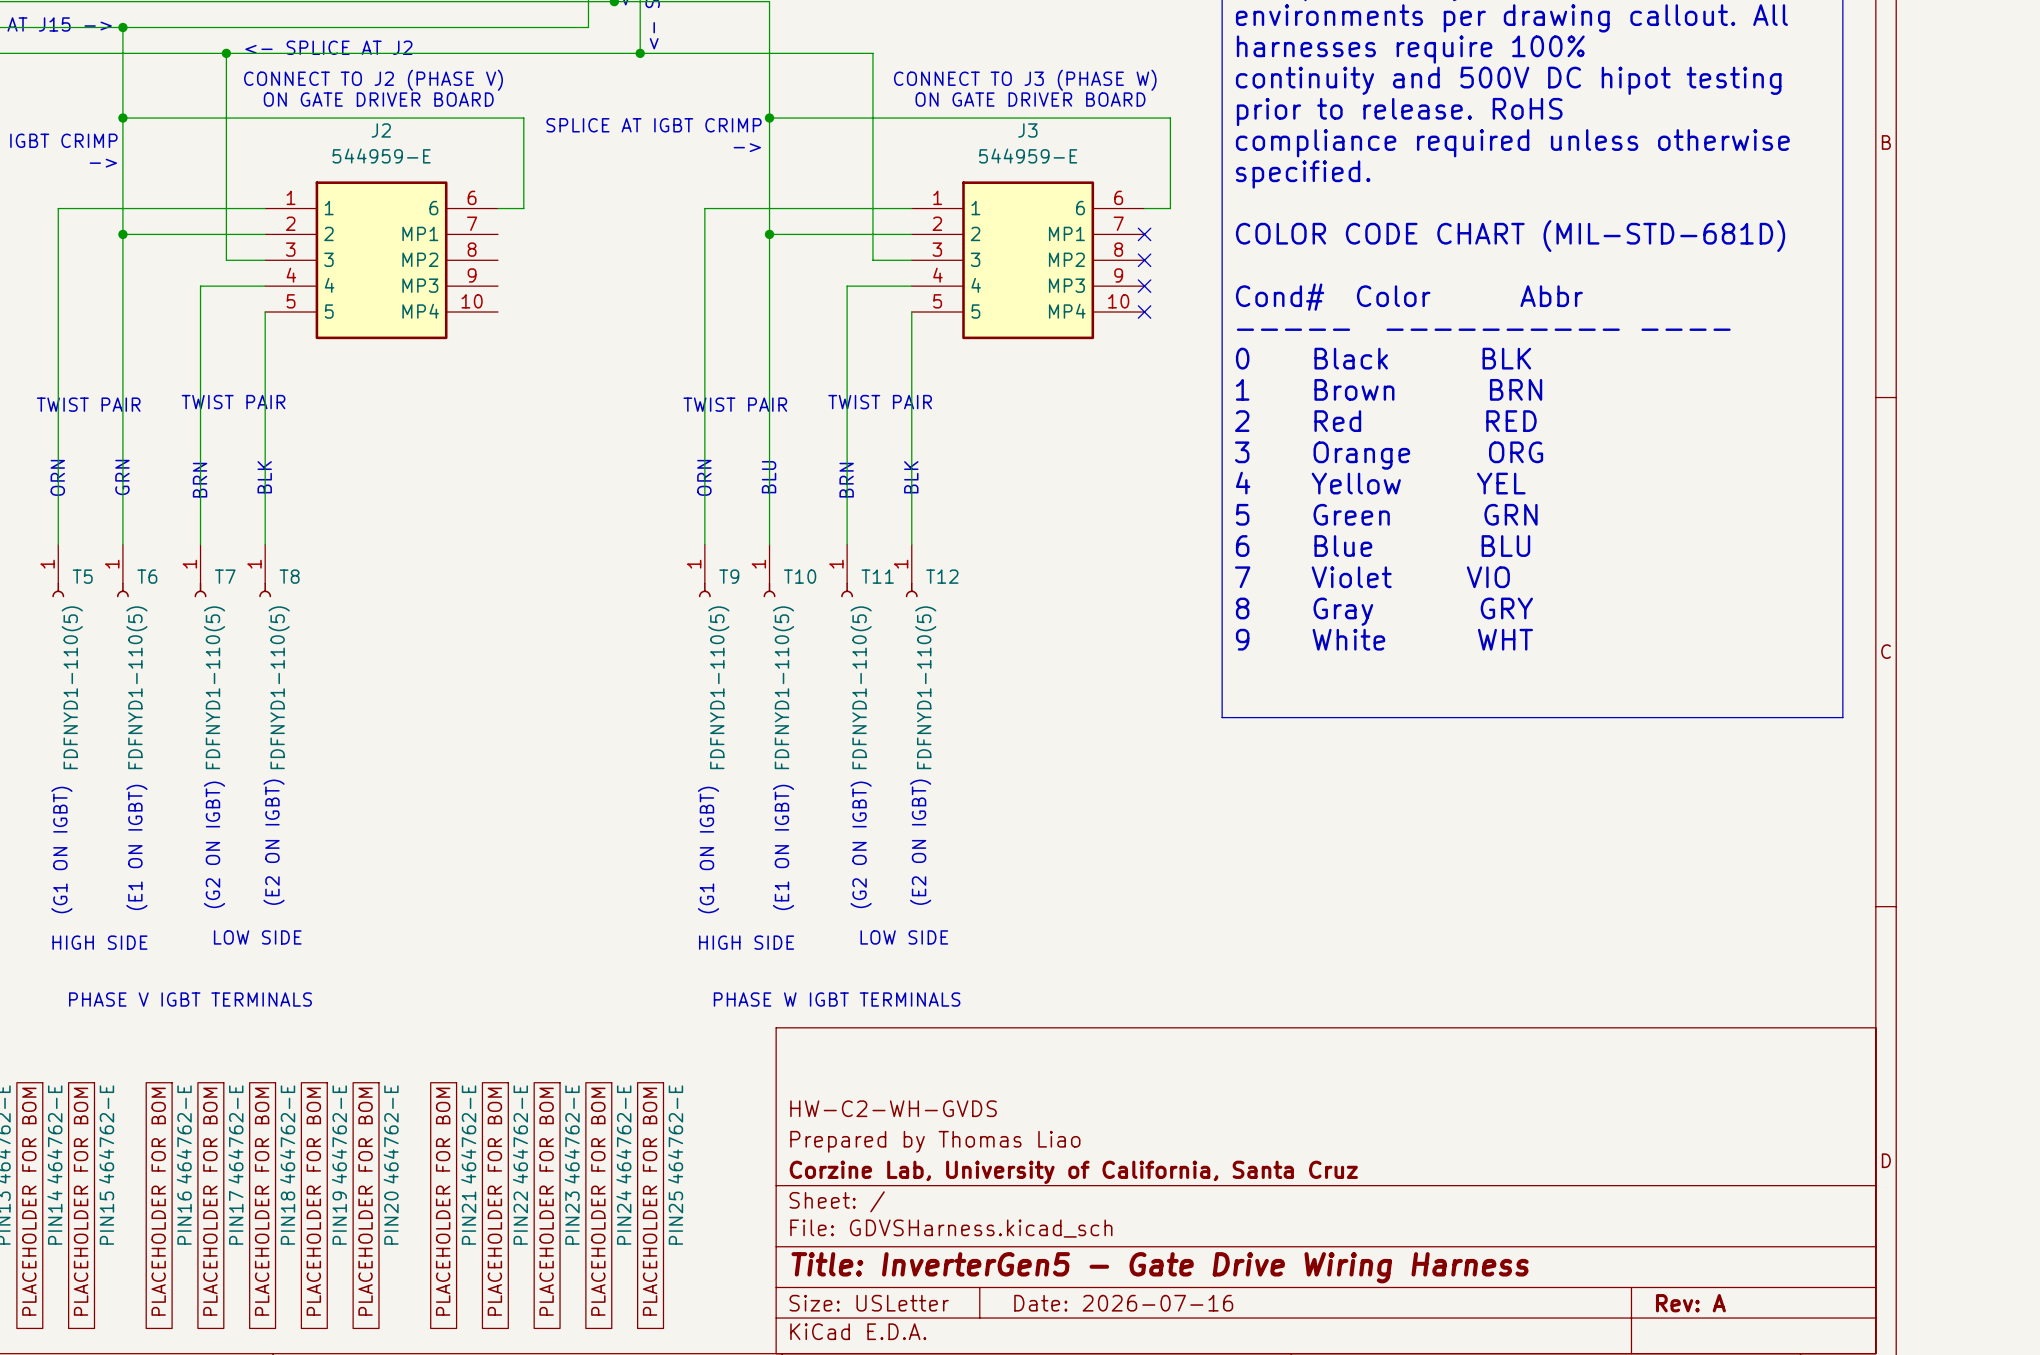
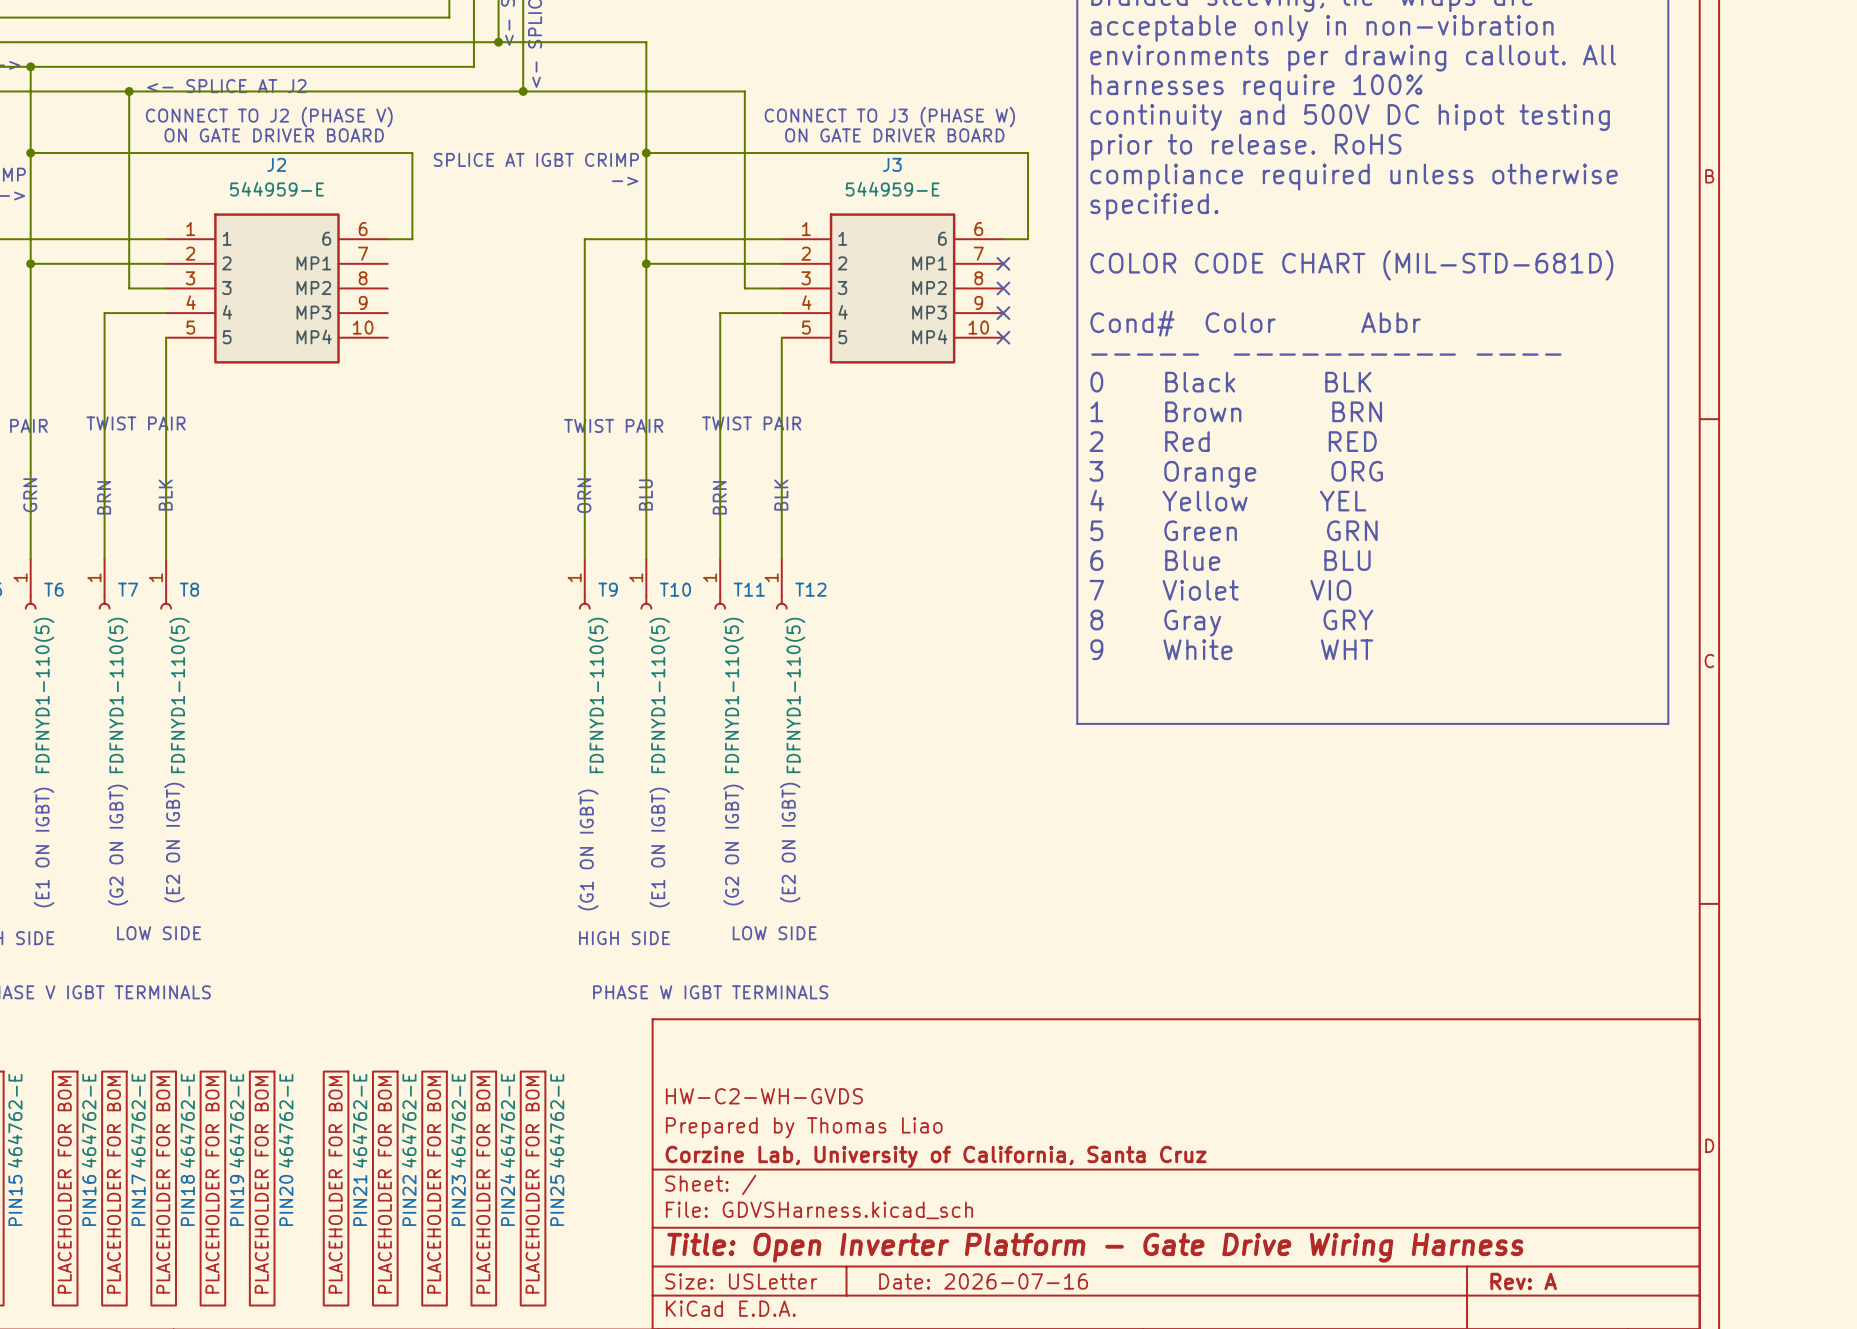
title block: Title: InverterGen5 - Gate Drive Wiring Harness (1160, 1267) -> Title: Open Inverter Platform - Gate Drive Wiring Harness (1095, 1247)

